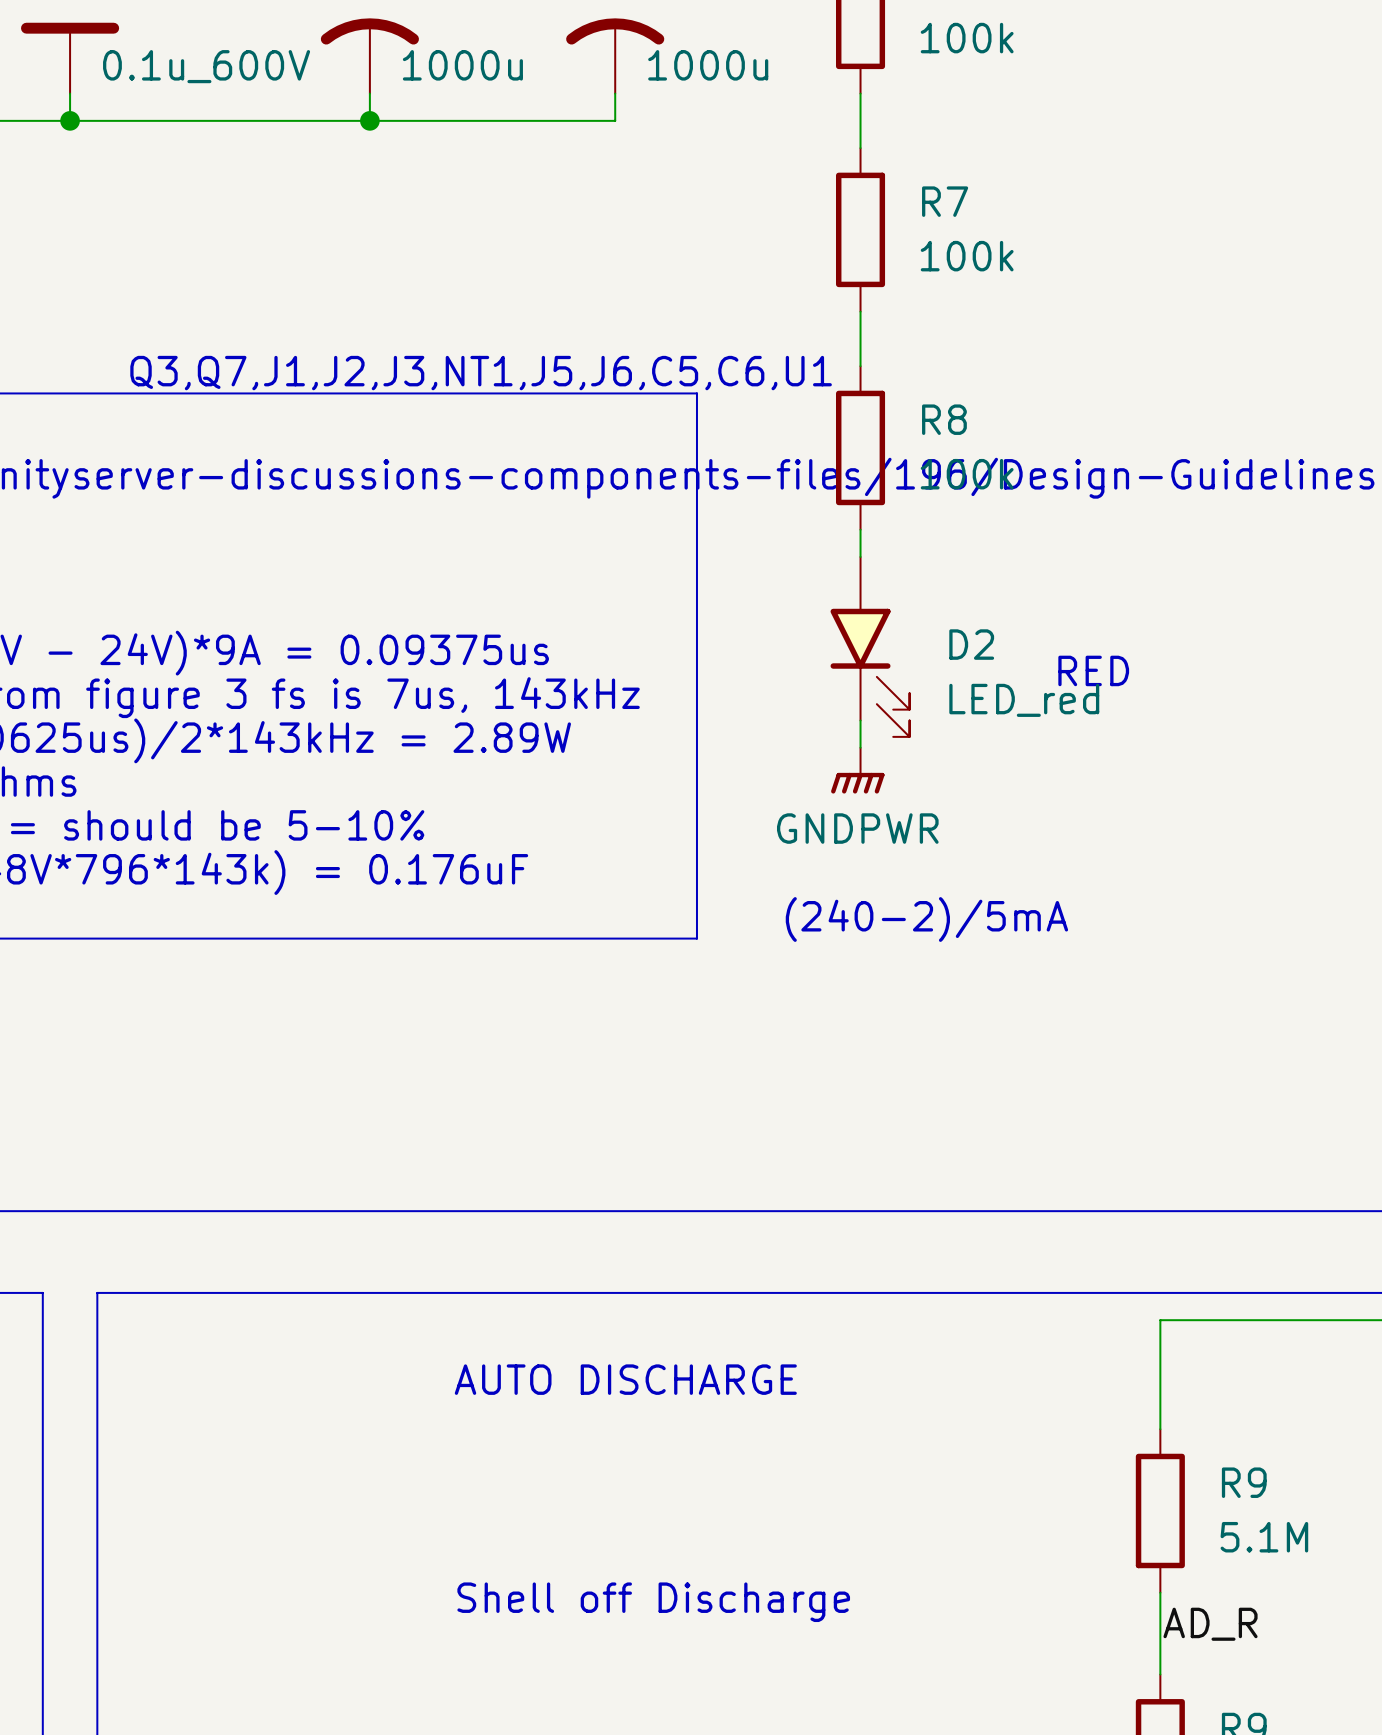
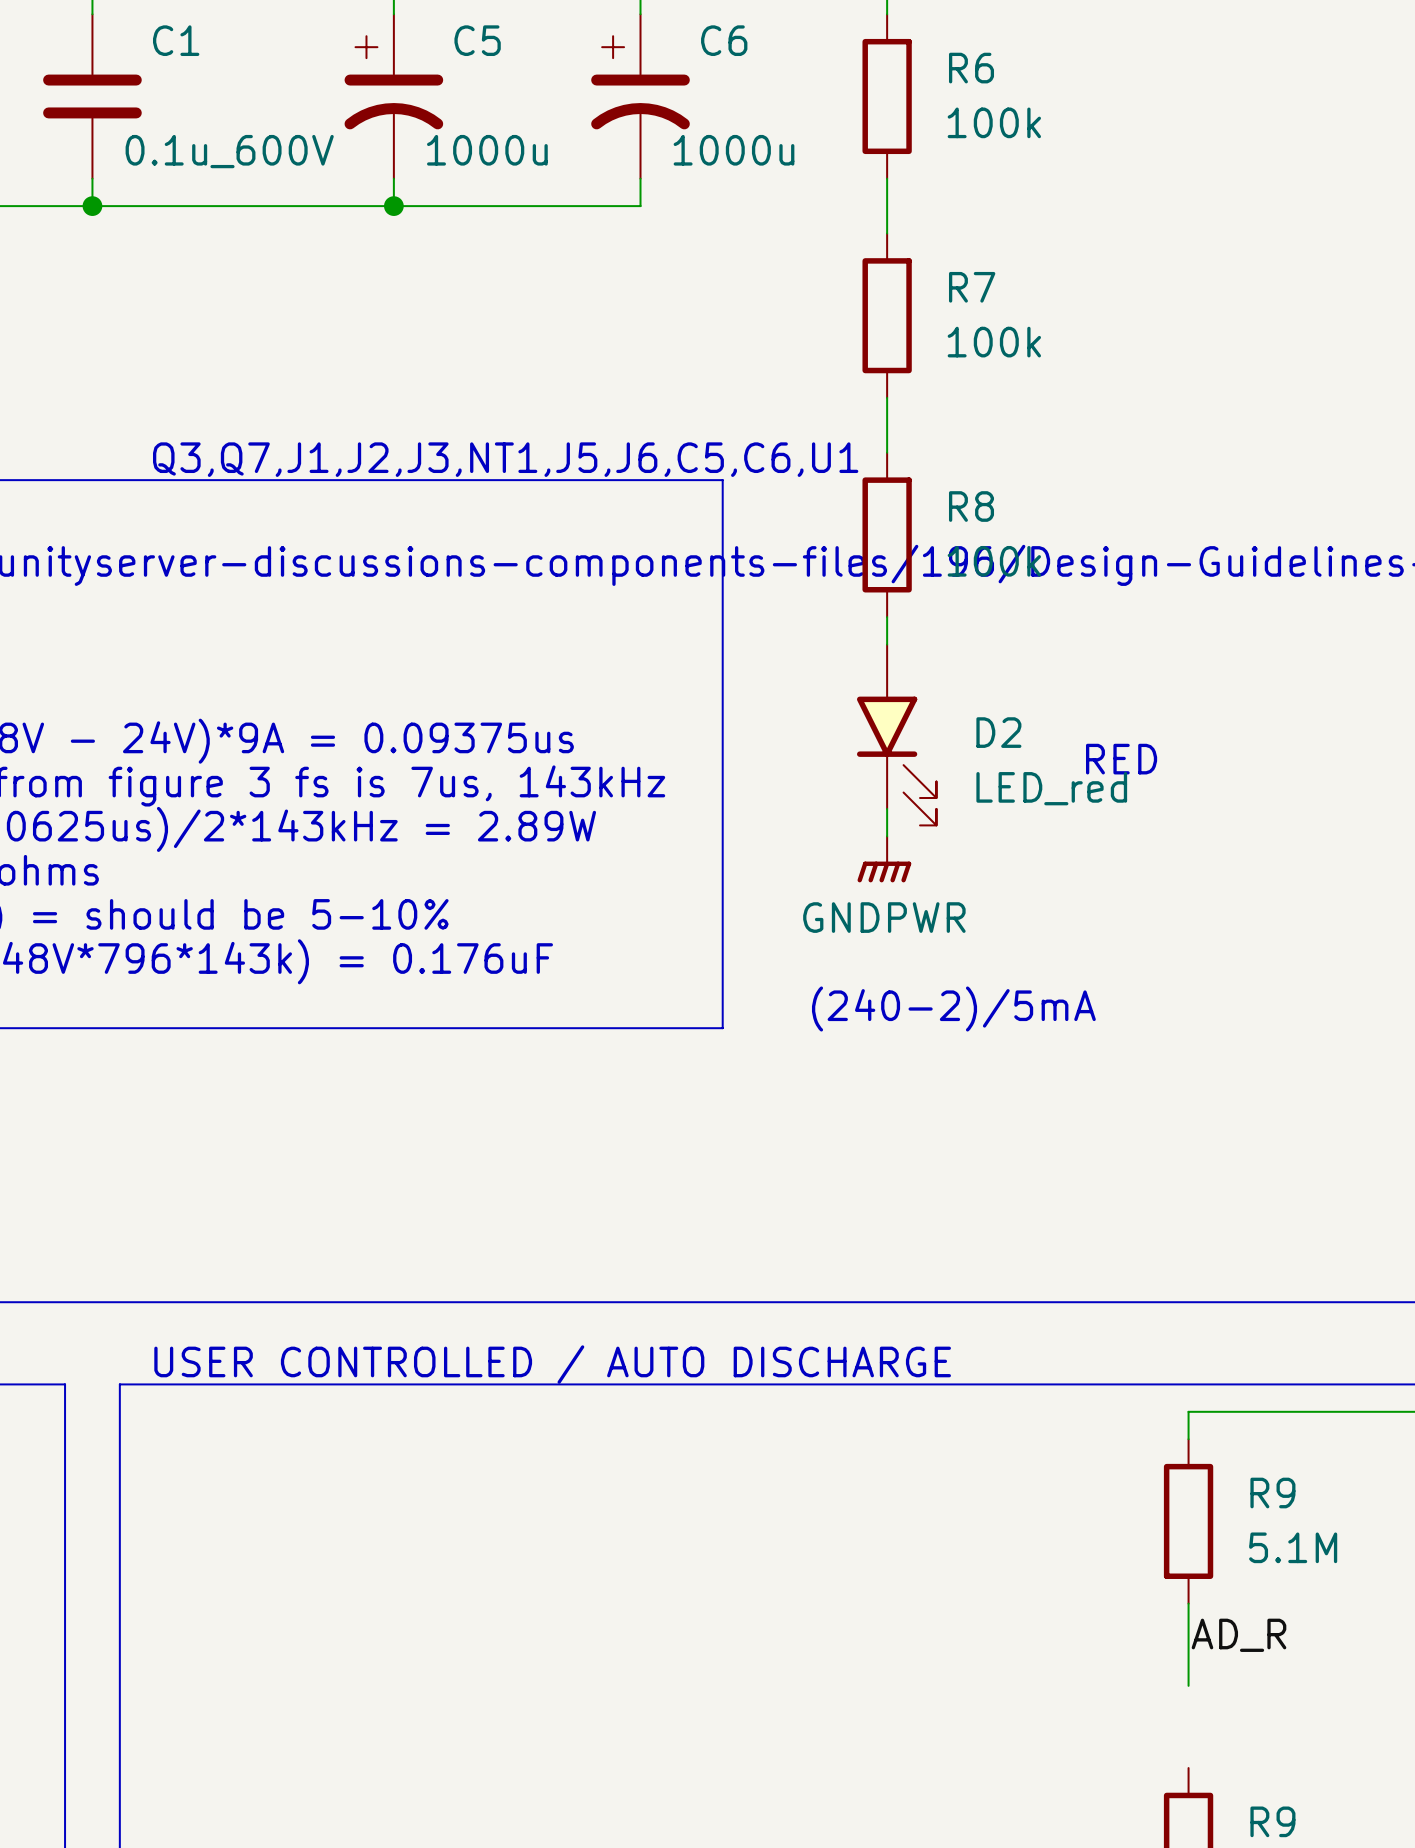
text: none -> USER CONTROLLED / AUTO DISCHARGE (552, 1364)
wire: (1160, 1347) (1160, 1429) -> none
text: AUTO DISCHARGE (625, 1379) -> none
R9 position: (1160, 1510) -> (1188, 1521)
wire: (1160, 1592) (1160, 1674) -> (1188, 1685) (1188, 1603)
text: Shell off Discharge (653, 1602) -> none
label position: AD_R (1210, 1624) -> AD_R (1239, 1635)

